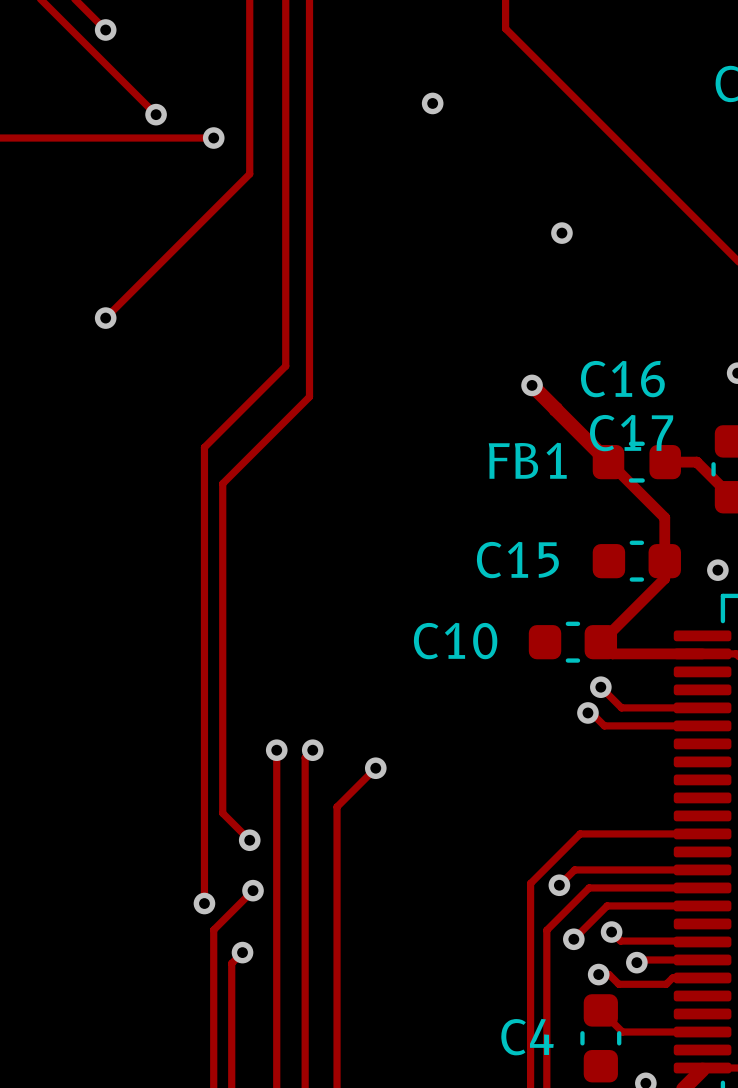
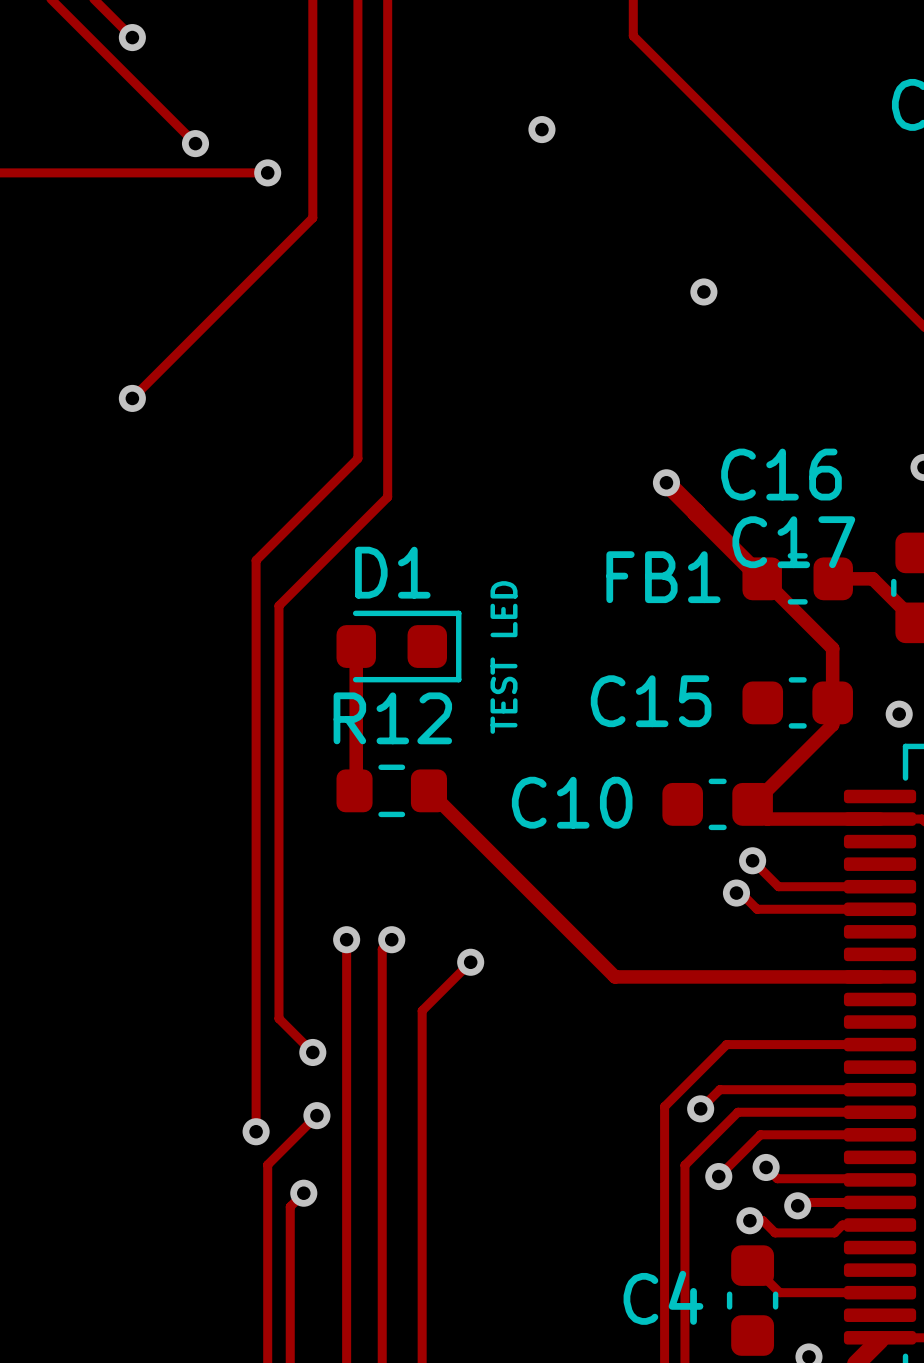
track: none -> (356, 646) (356, 789) (354, 790)
D1: none -> (398, 646)
text: none -> TEST LED (504, 657)
R12: none -> (391, 790)
track: none -> (428, 790) (615, 976) (880, 976)

